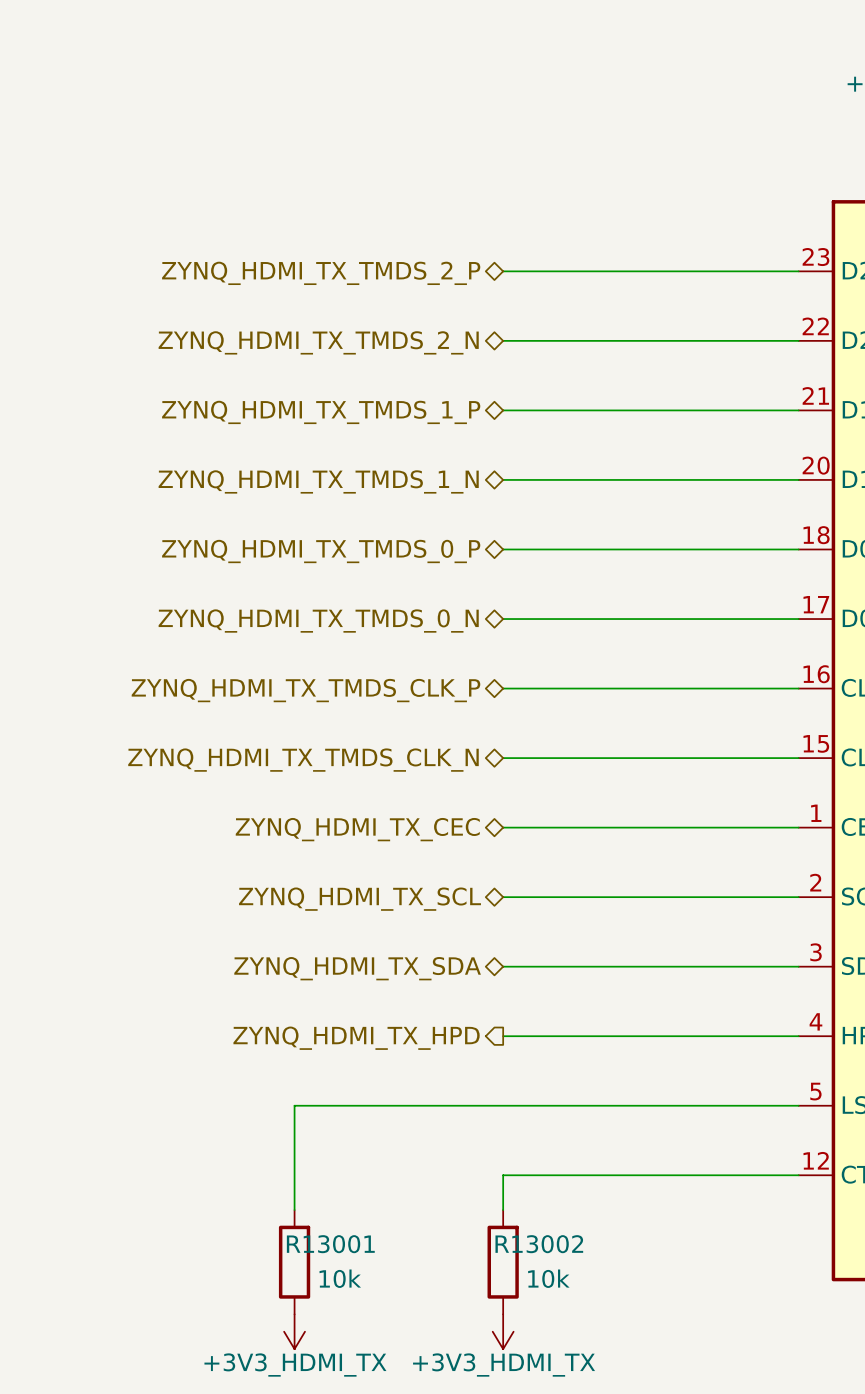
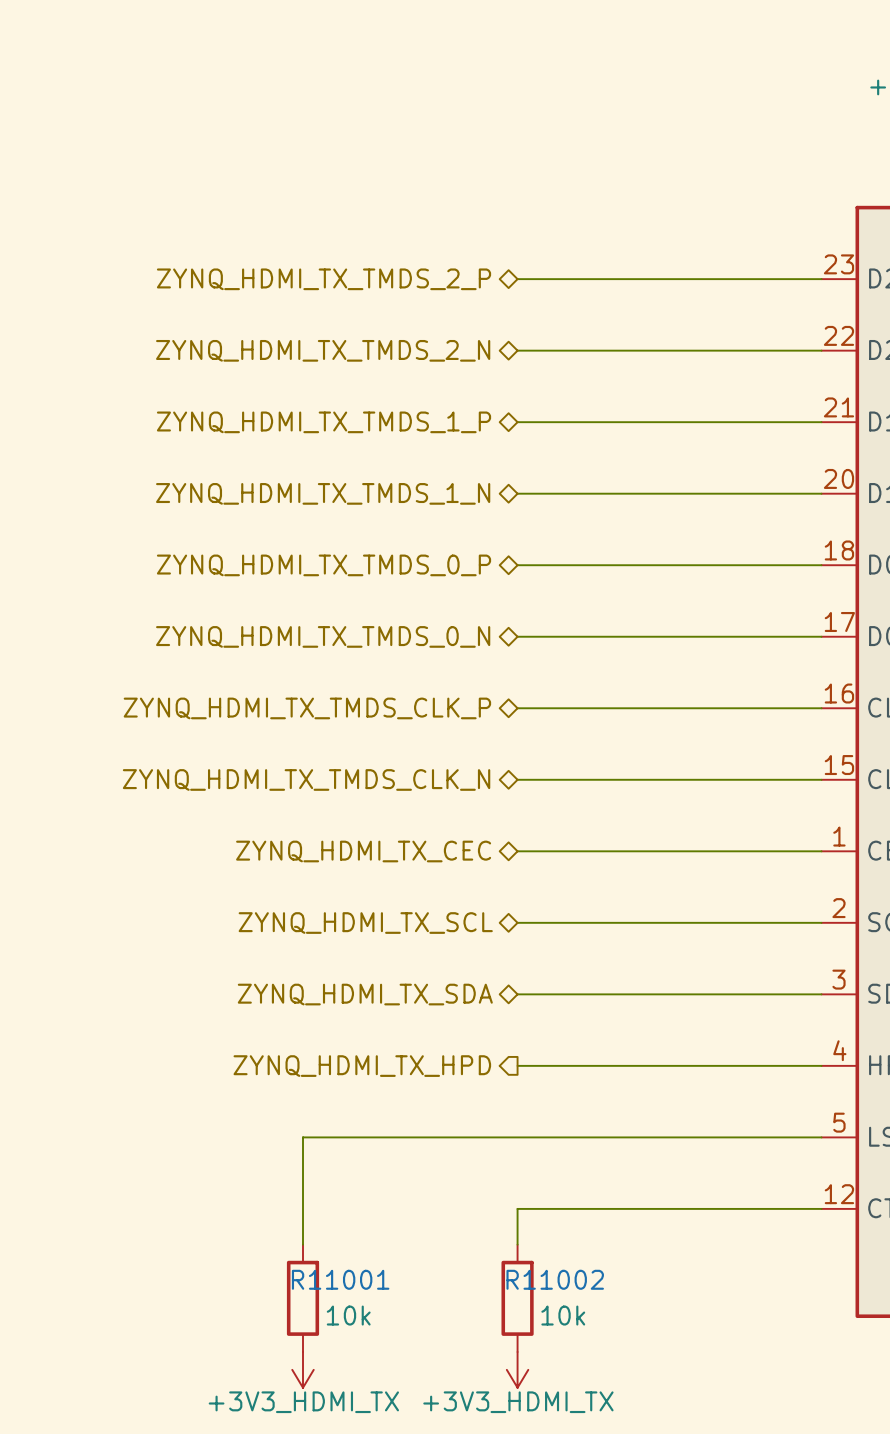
R13001 name: R13001 (330, 1244) -> R11001 (340, 1279)
R13002 name: R13002 (539, 1244) -> R11002 (555, 1279)

